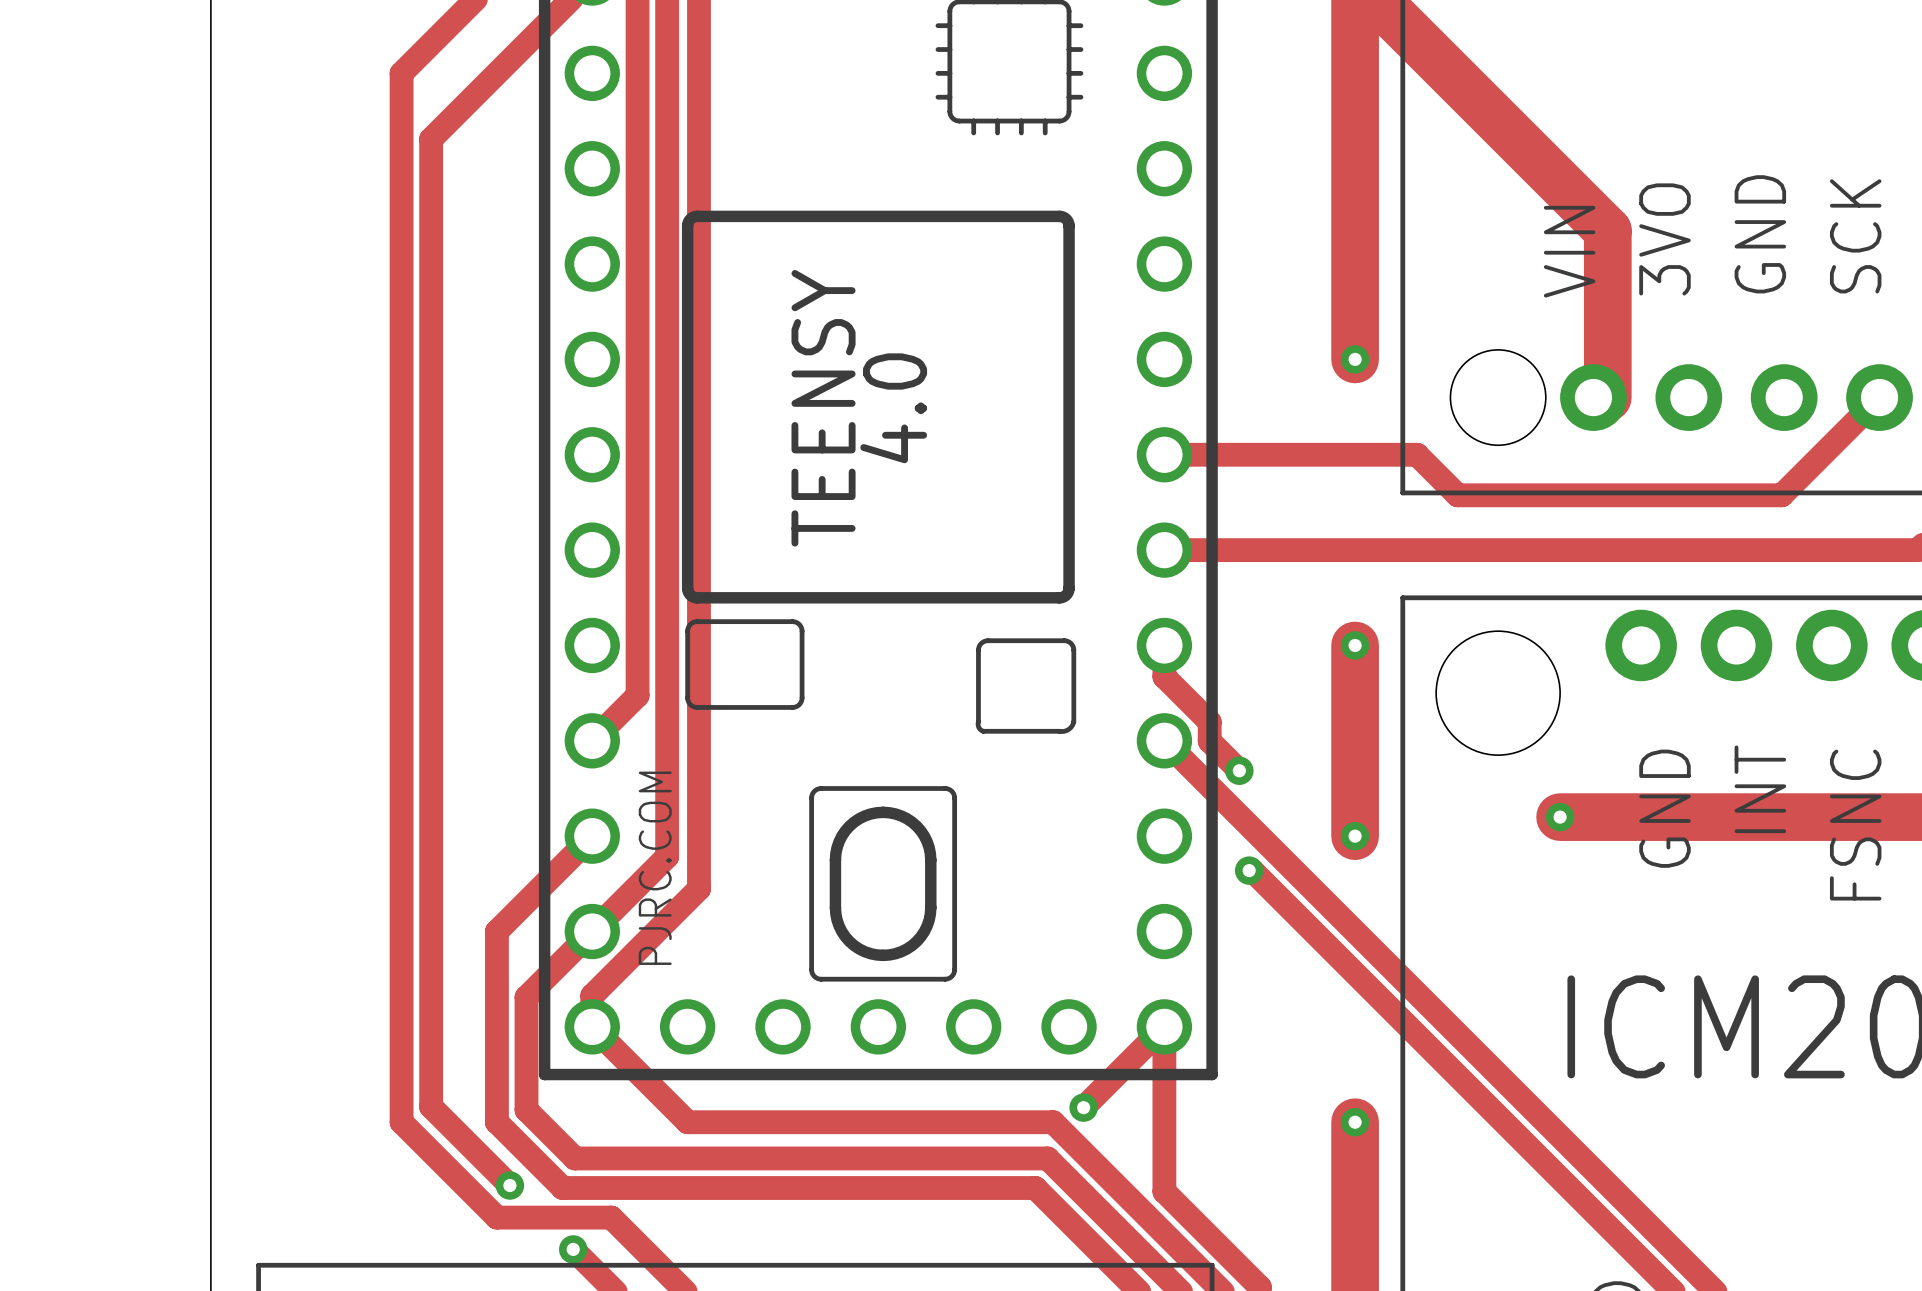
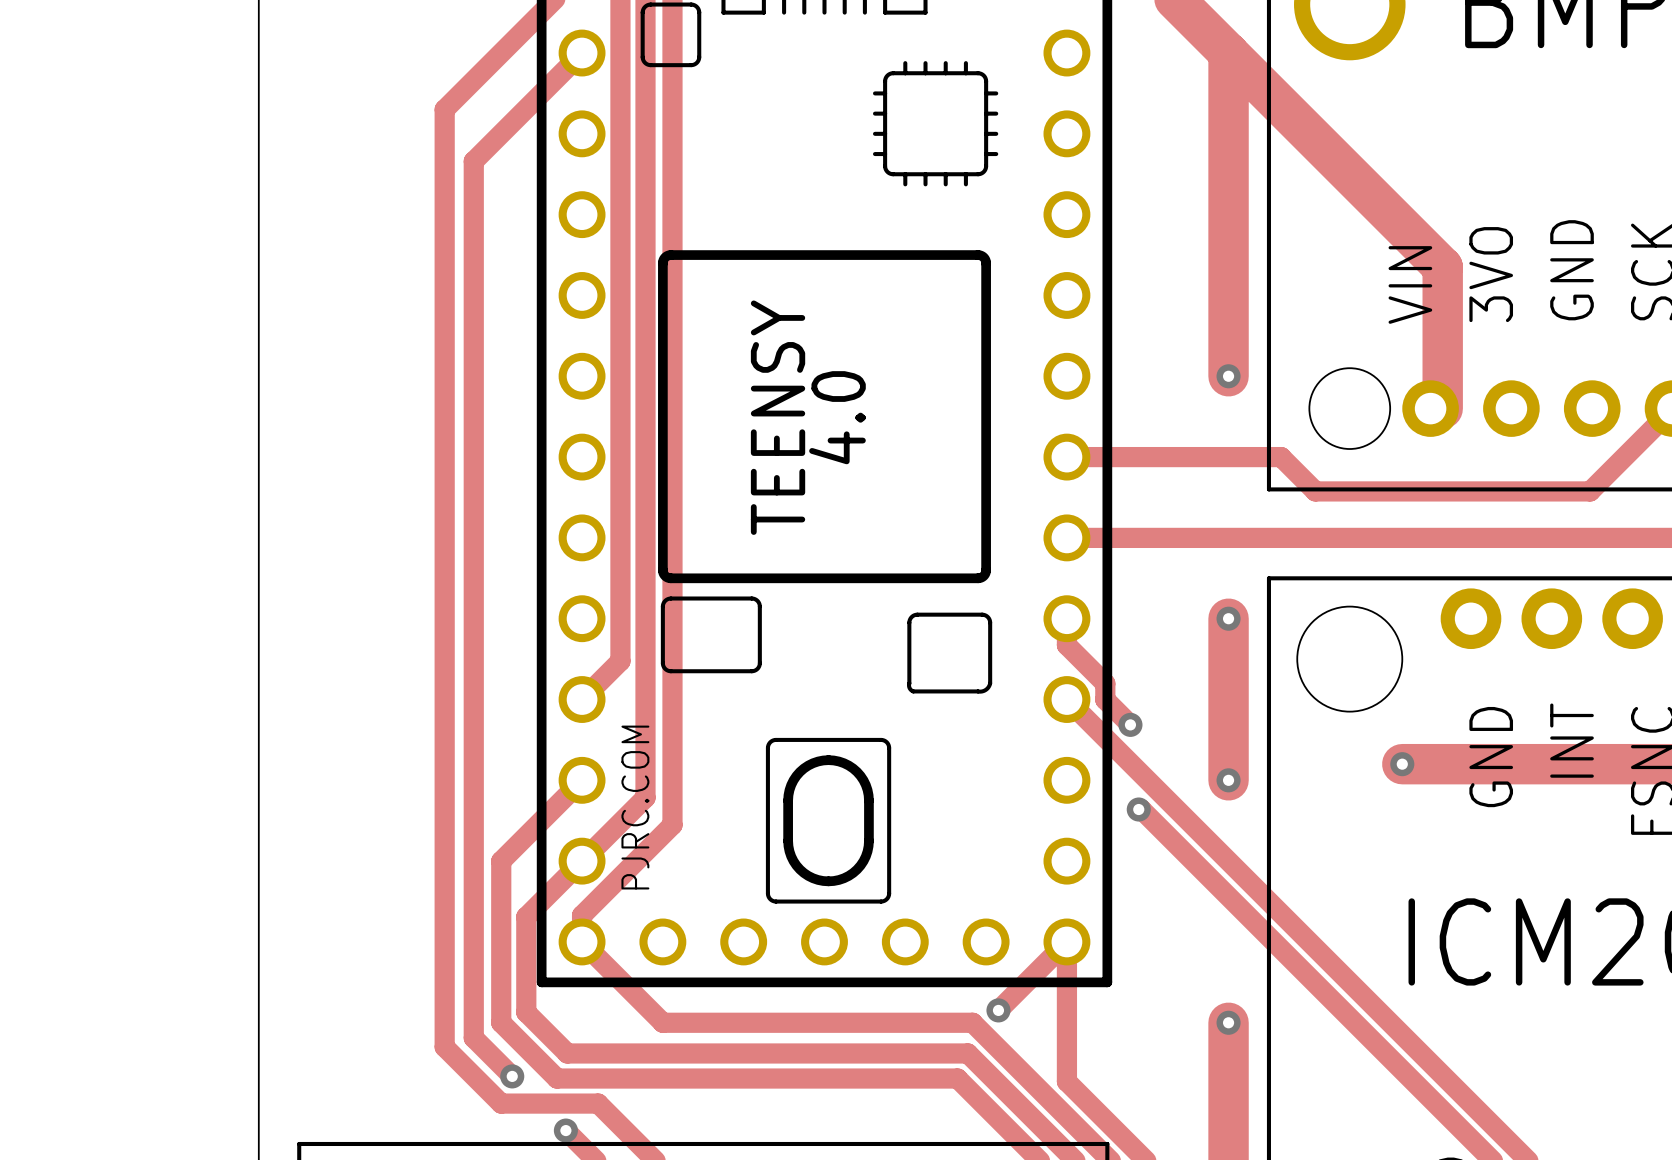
track: (430, 44) (401, 73) (401, 1122) (430, 1150) -> (444, 109) (444, 1047)
track: (464, 105) (431, 139) (431, 1106) (464, 1140) -> (473, 161) (473, 1037)

